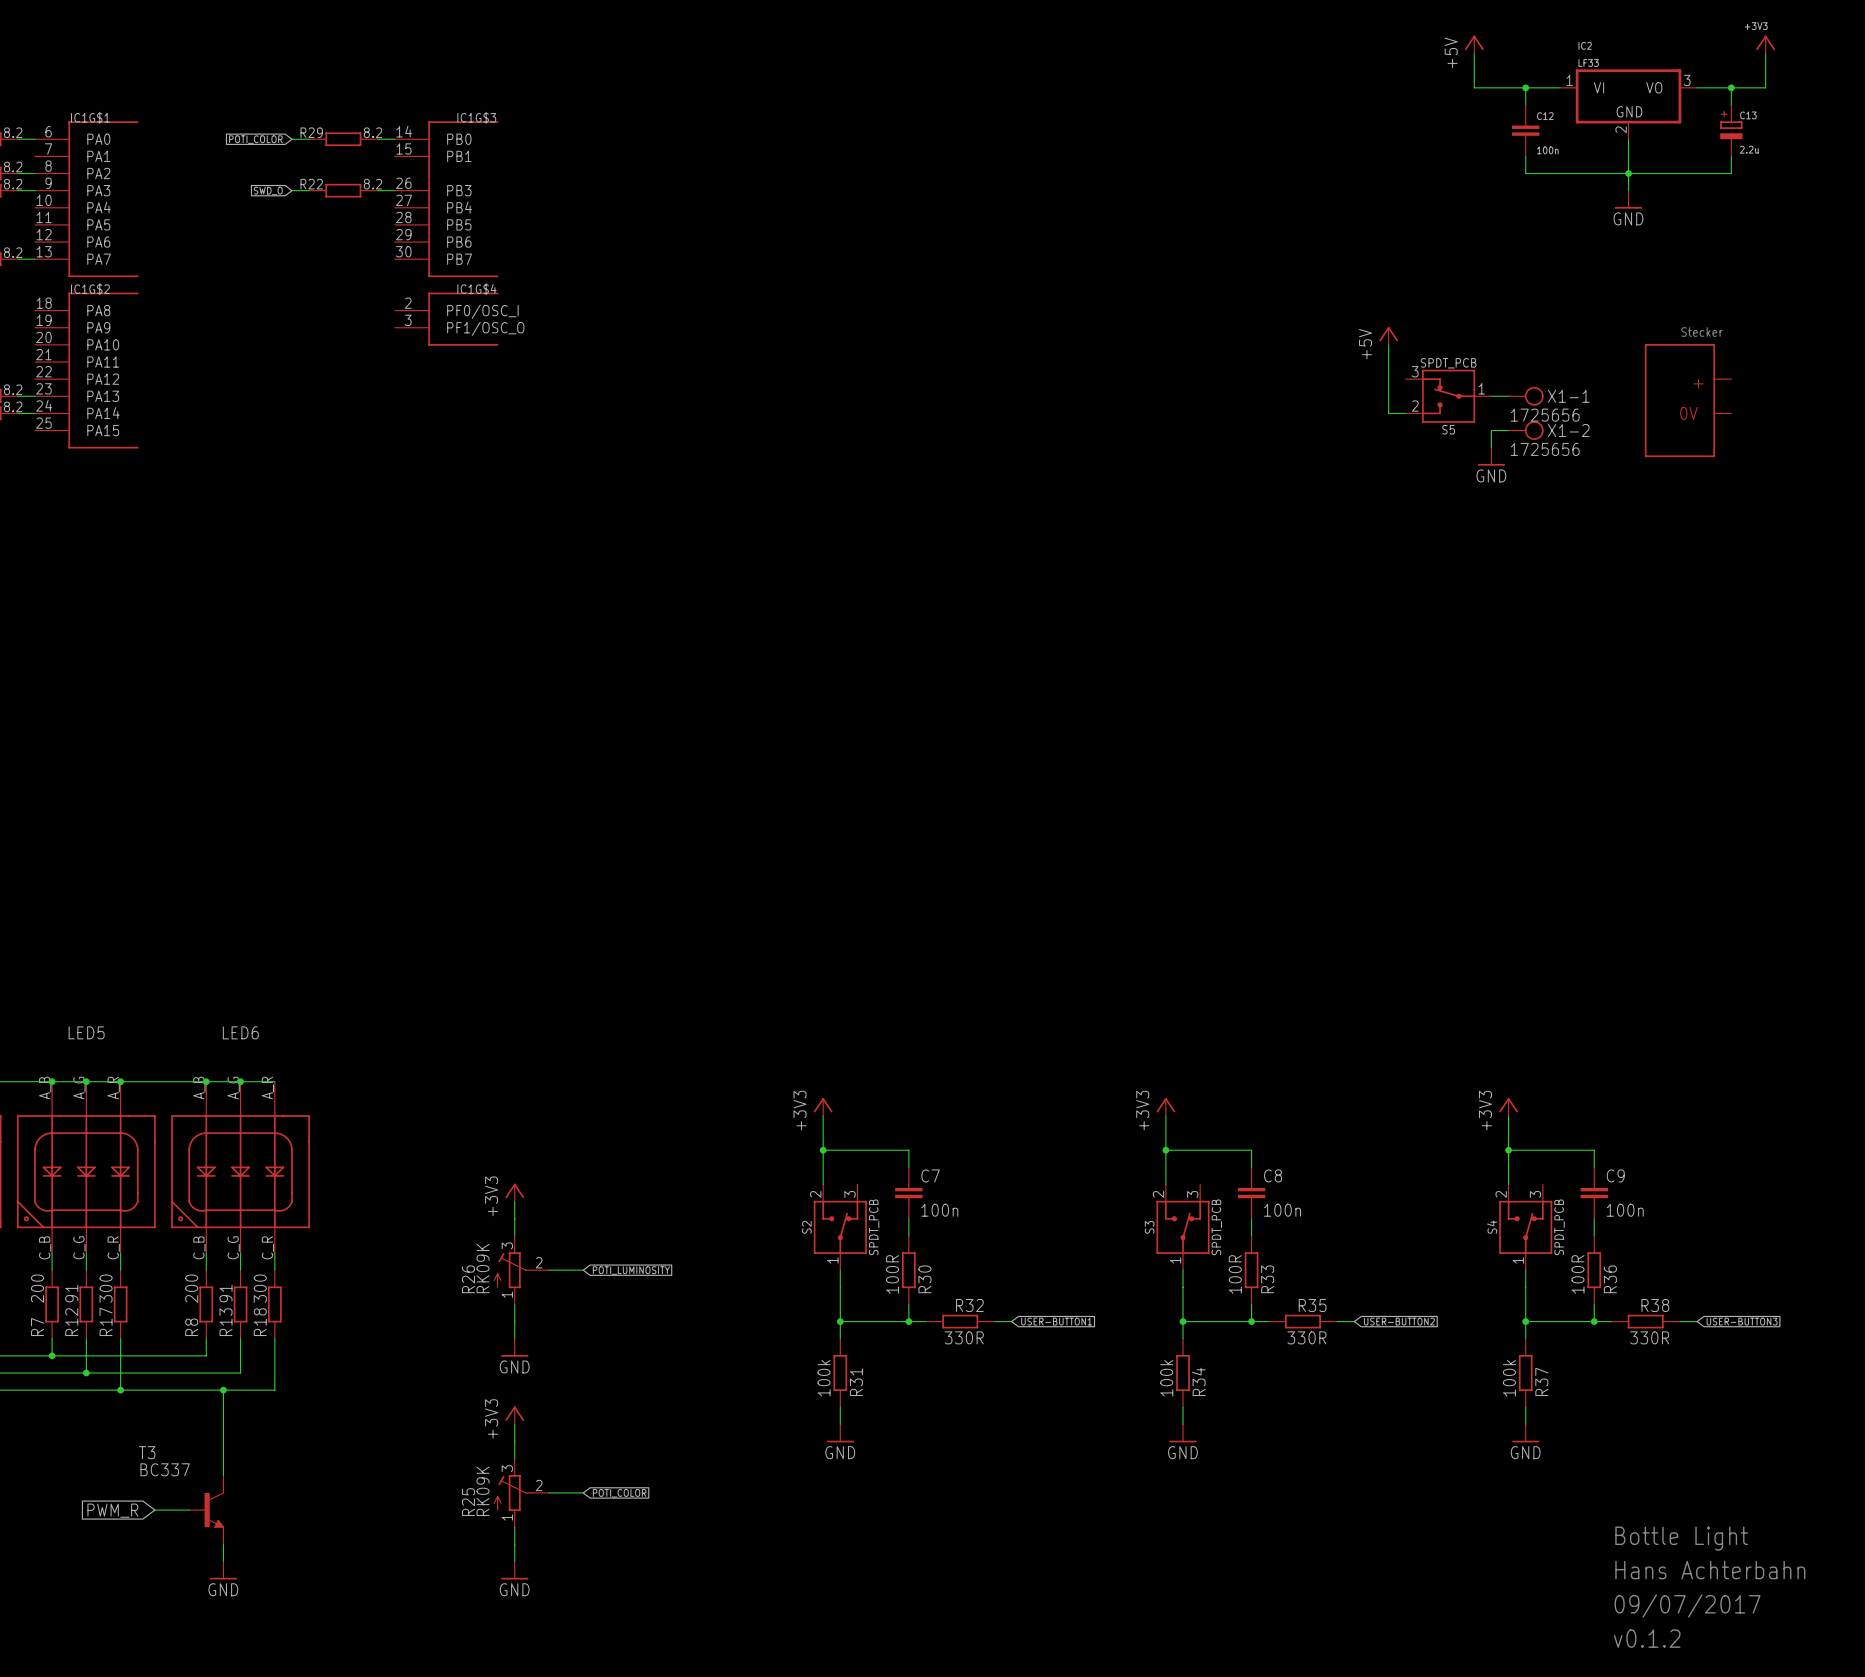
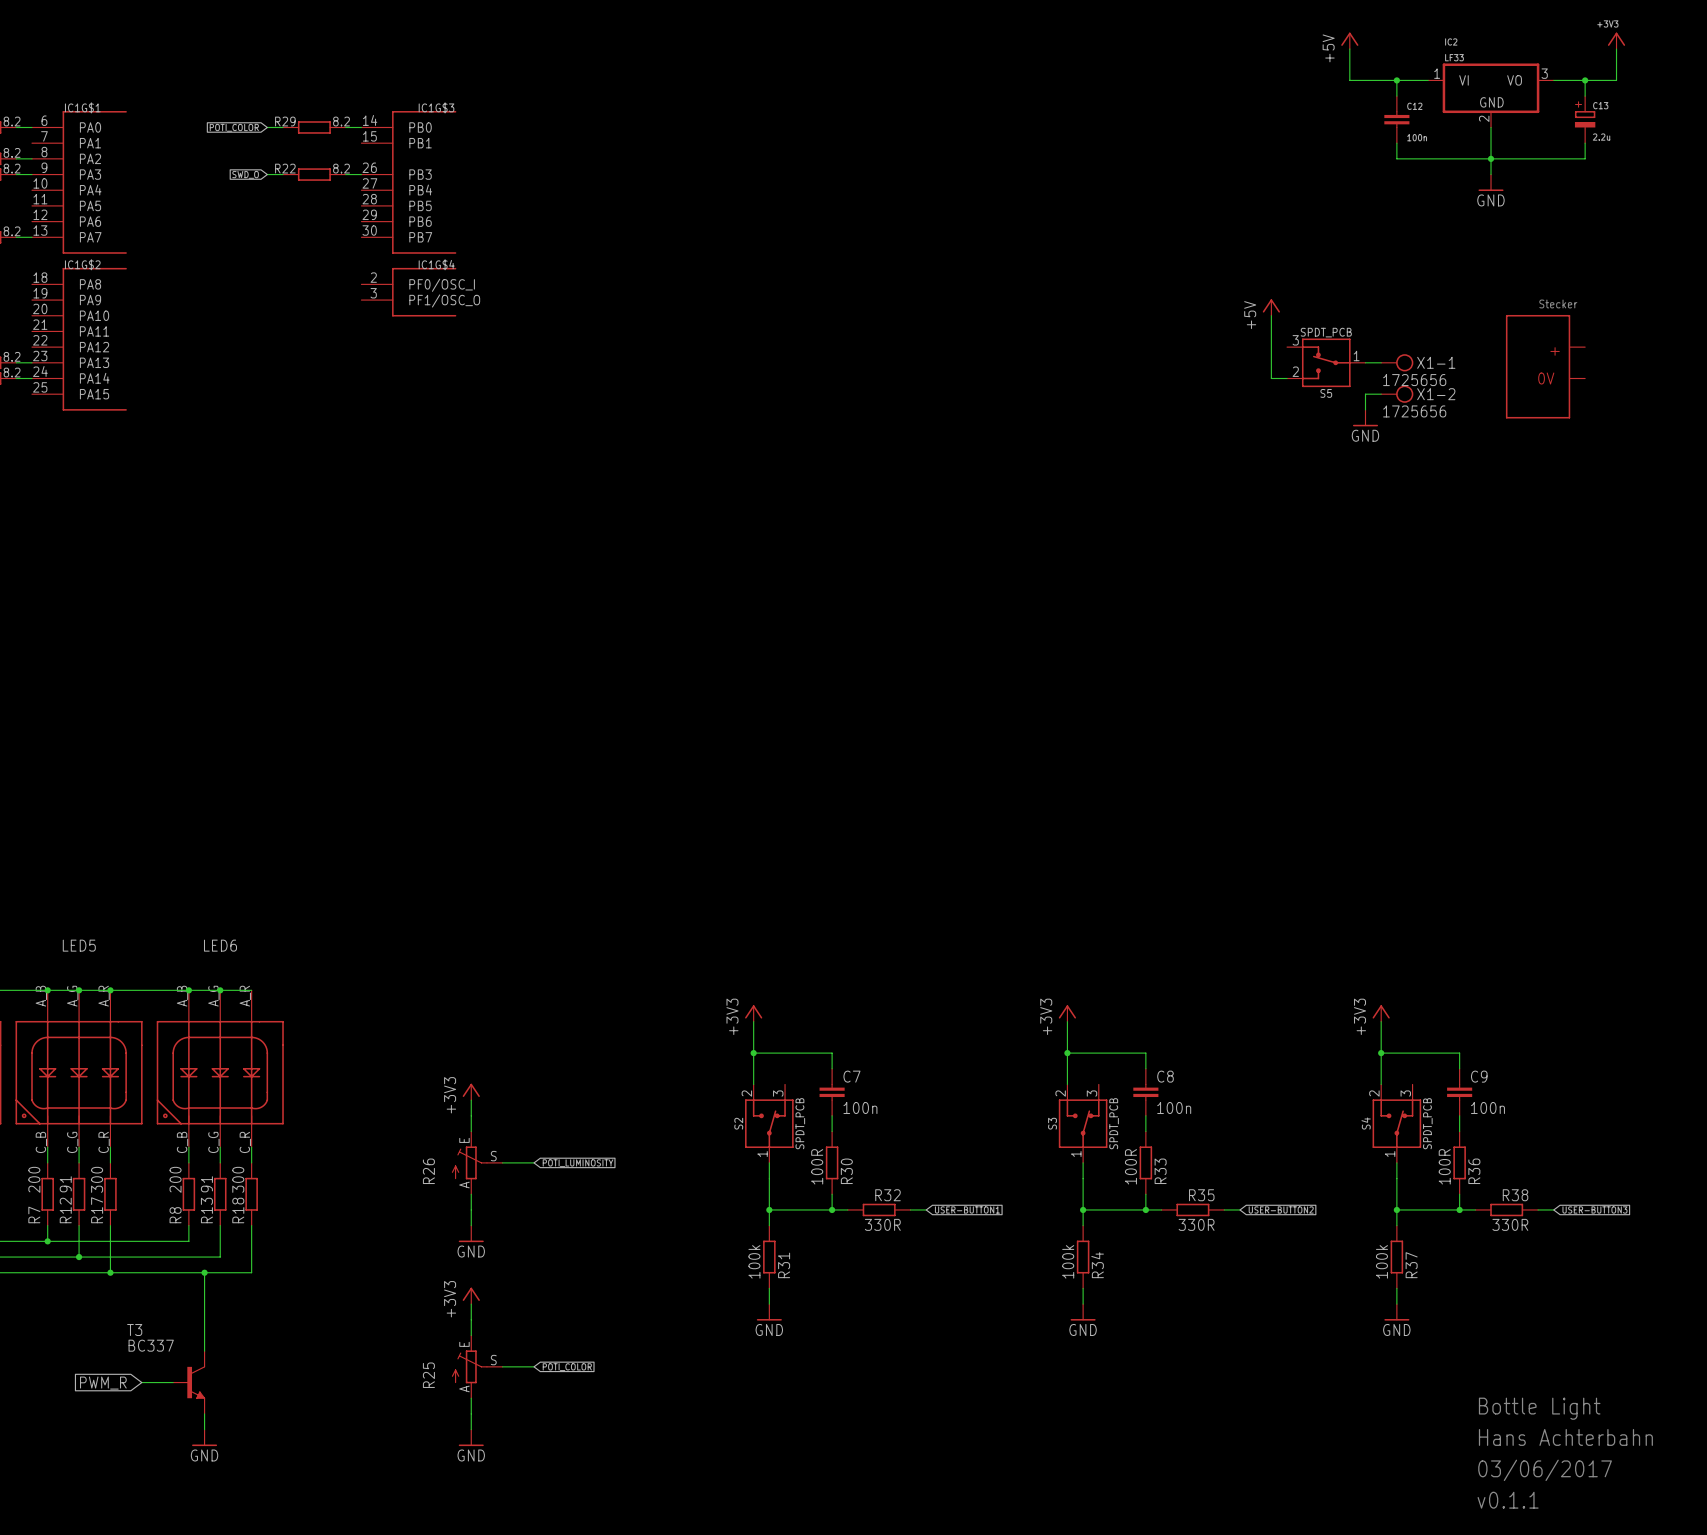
R26 symbol: [493, 1235, 550, 1305] -> [451, 1131, 503, 1195]
R26 value: RK09K (483, 1268) -> none
R25 symbol: [493, 1458, 550, 1528] -> [451, 1335, 503, 1399]
R25 value: RK09K (483, 1491) -> none
text: 09/07/2017 (1687, 1605) -> 03/06/2017 (1545, 1470)
text: v0.1.2 (1647, 1638) -> v0.1.1 (1508, 1500)

